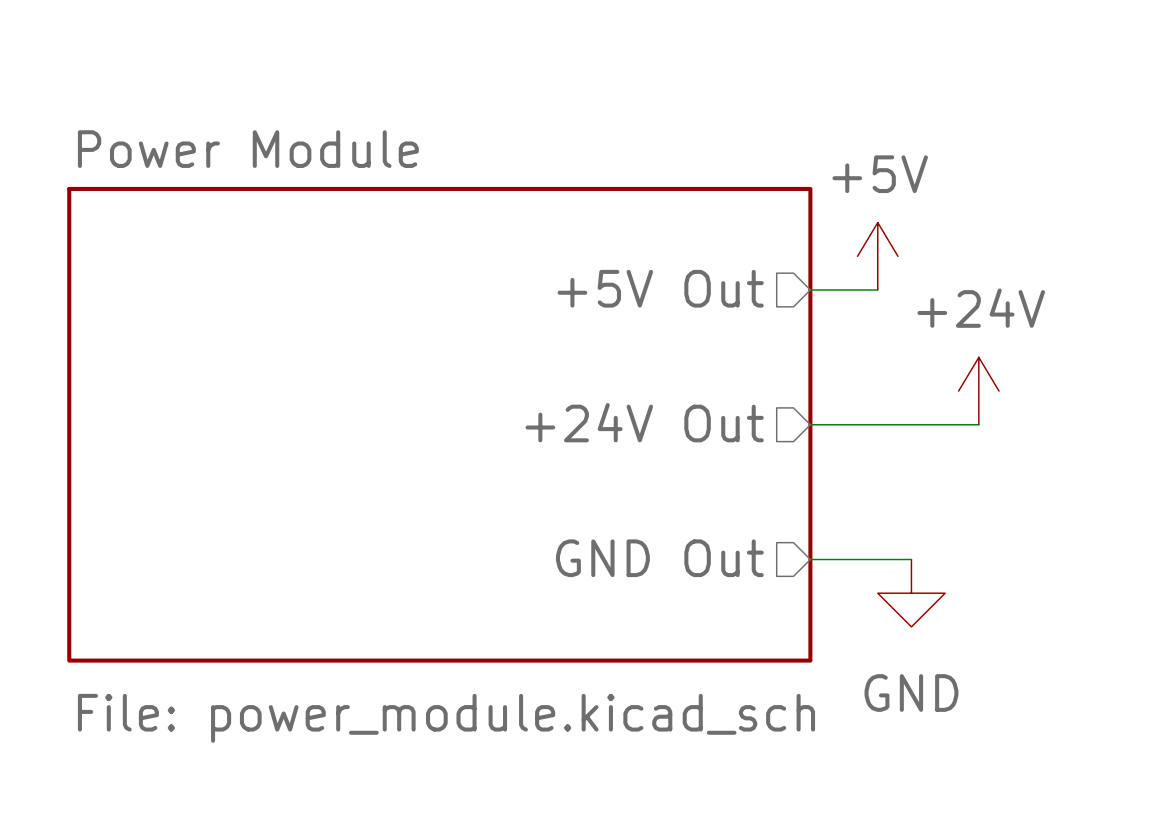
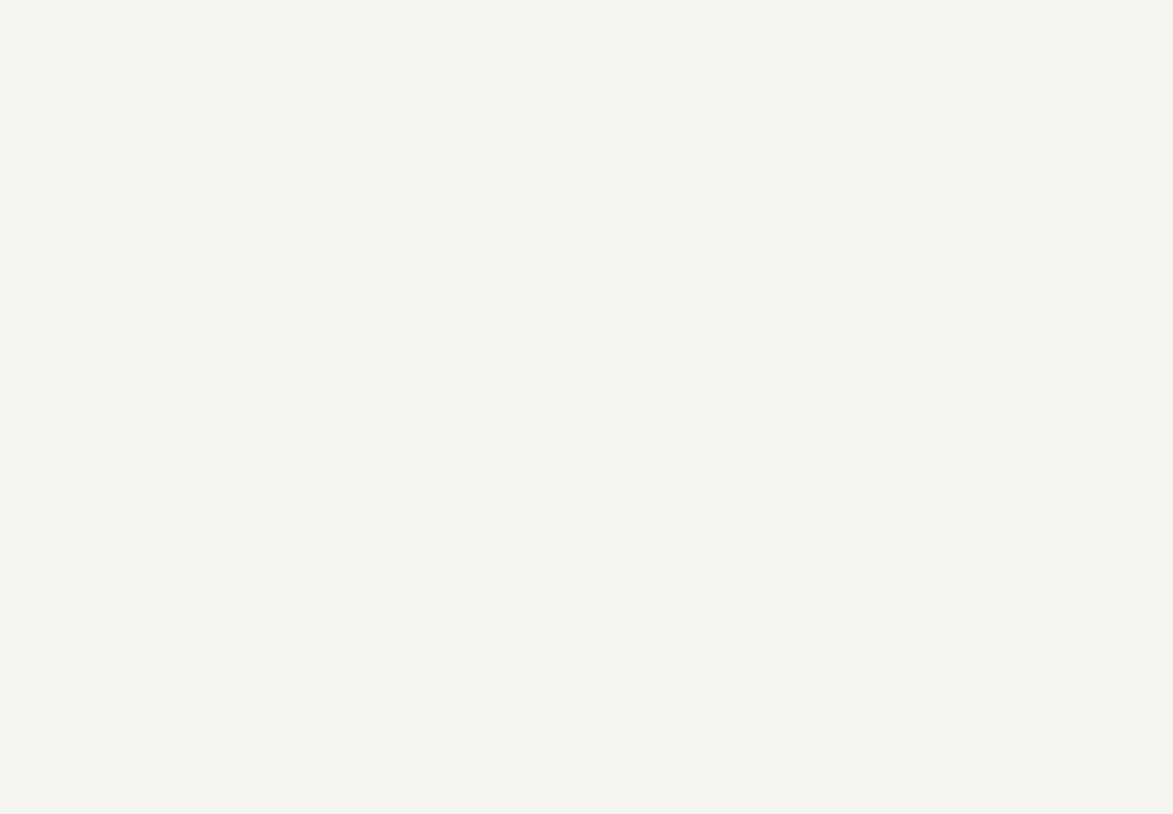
power symbol: +5V (877, 256) -> none
sheet pin: +5V Out (660, 288) -> none
wire: (810, 290) (877, 290) -> none
power symbol: +24V (978, 391) -> none
sheet pin: +24V Out (644, 422) -> none
sheet Power Module: File: power_module.kicad_sch (439, 424) -> none
wire: (810, 424) (978, 424) -> none
sheet pin: GND Out (659, 558) -> none
wire: (810, 559) (911, 559) -> none
power symbol: GND (911, 593) -> none

